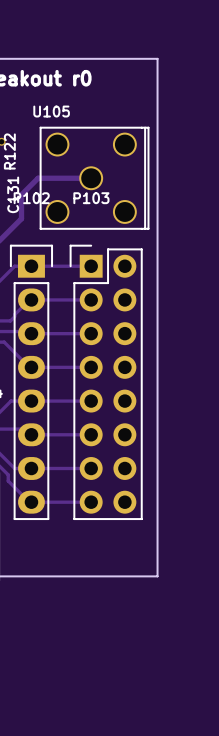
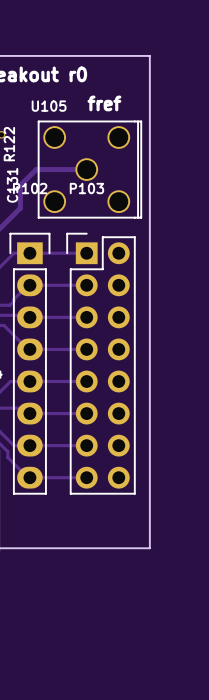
text: none -> fref (104, 103)

